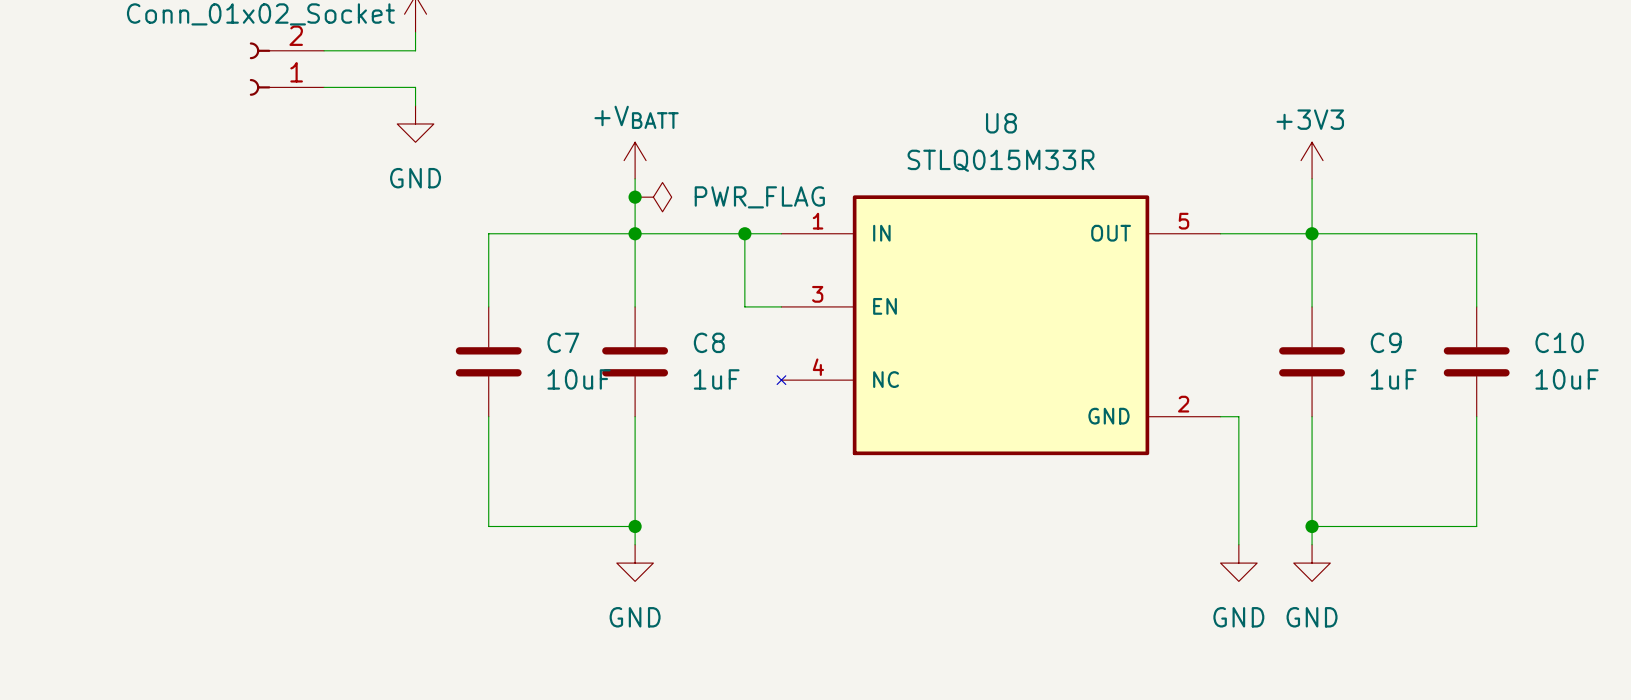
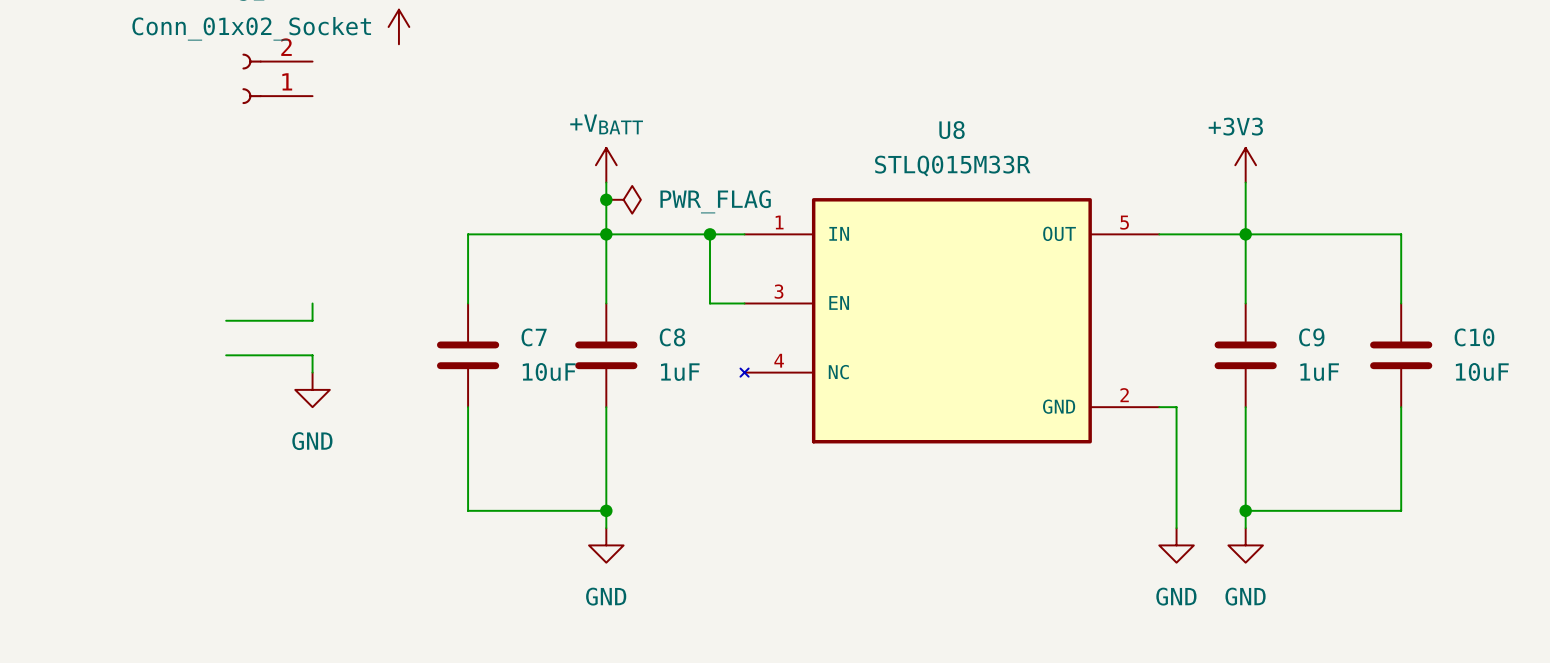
wire: (415, 32) (415, 50) (324, 50) -> (312, 303) (312, 320) (226, 320)
wire: (324, 87) (415, 87) (415, 105) -> (226, 355) (312, 355) (312, 372)
power symbol position: GND (415, 123) -> GND (312, 389)

